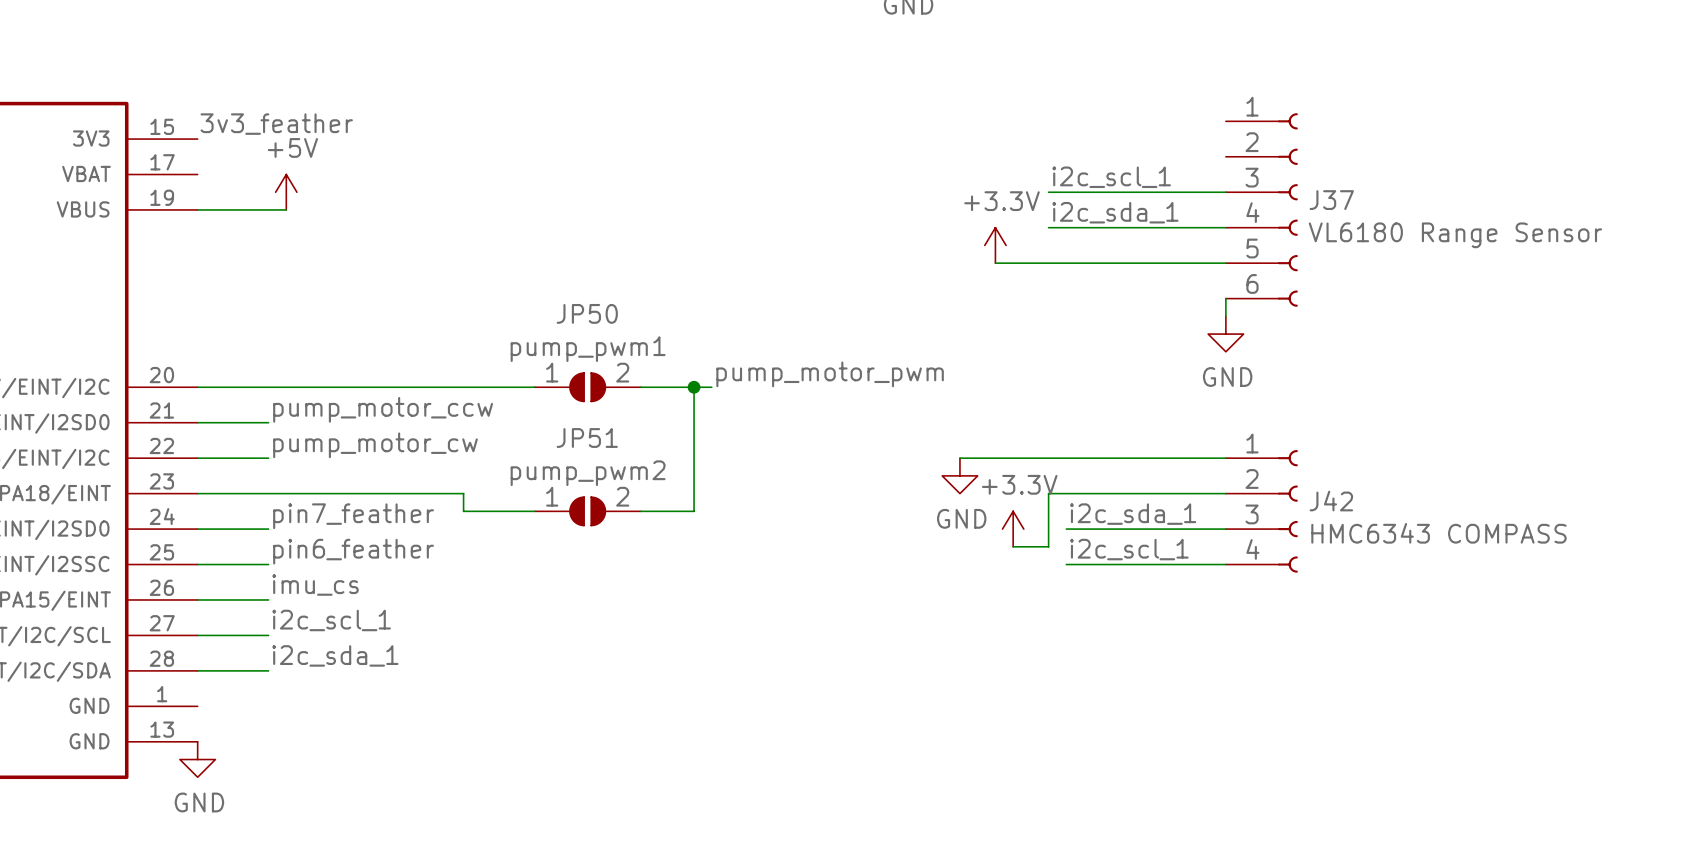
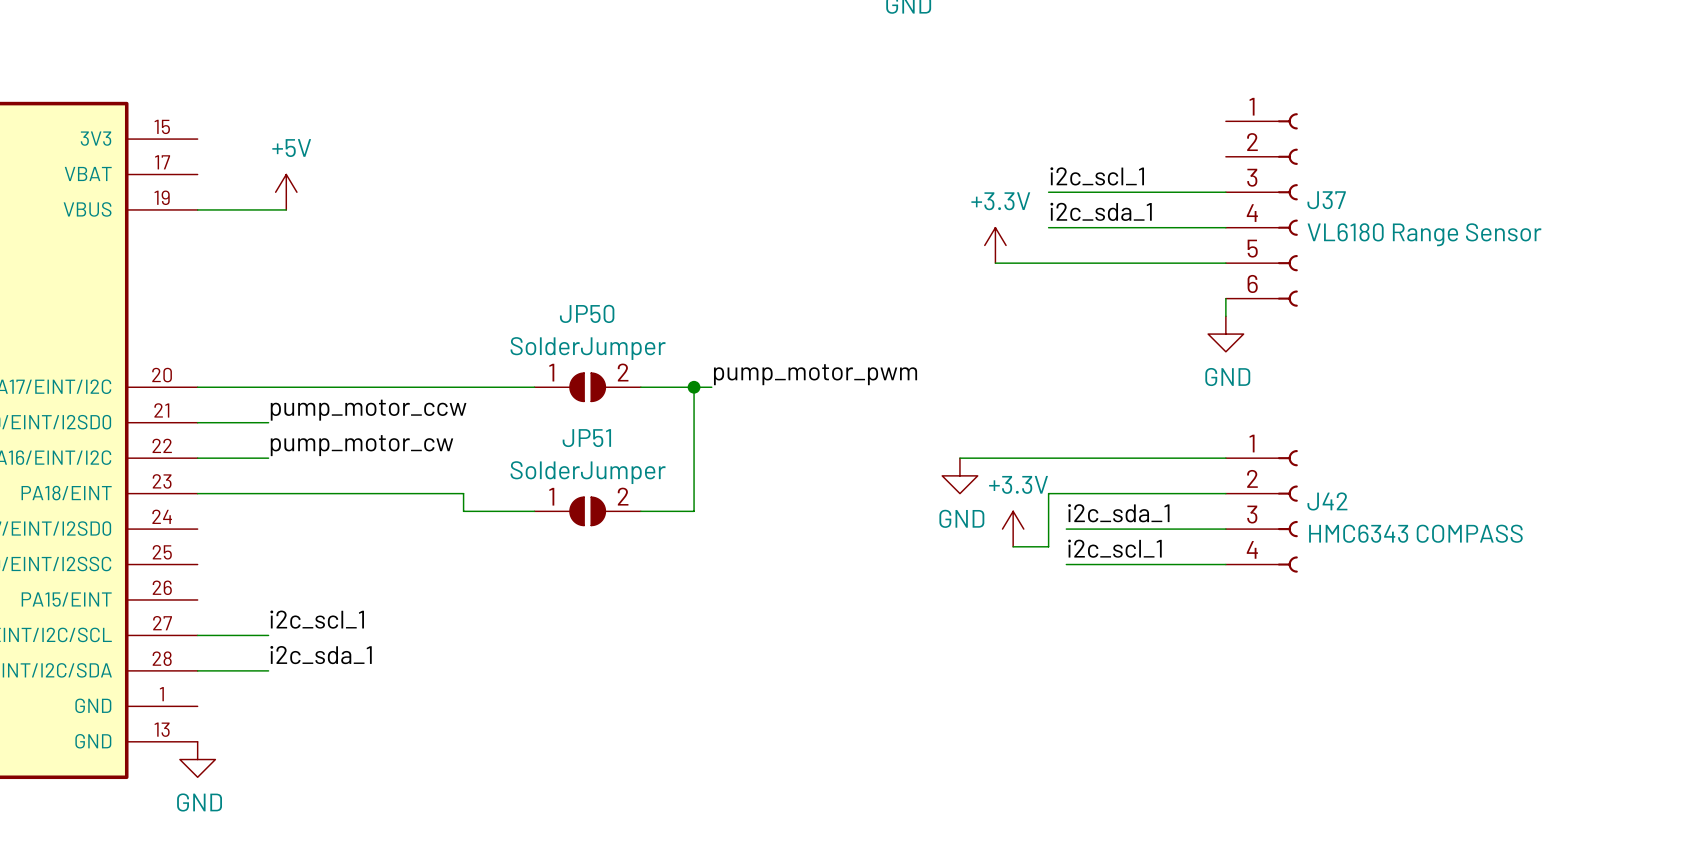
label: 3v3_feather (276, 124) -> none
JP50 value: pump_pwm1 (588, 349) -> SolderJumper (588, 348)
JP51 value: pump_pwm2 (588, 473) -> SolderJumper (588, 472)
label: pin7_feather (353, 516) -> none
wire: (197, 529) (268, 529) -> none
label: pin6_feather (353, 551) -> none
wire: (197, 564) (268, 564) -> none
label: imu_cs (315, 585) -> none
wire: (197, 599) (268, 599) -> none

